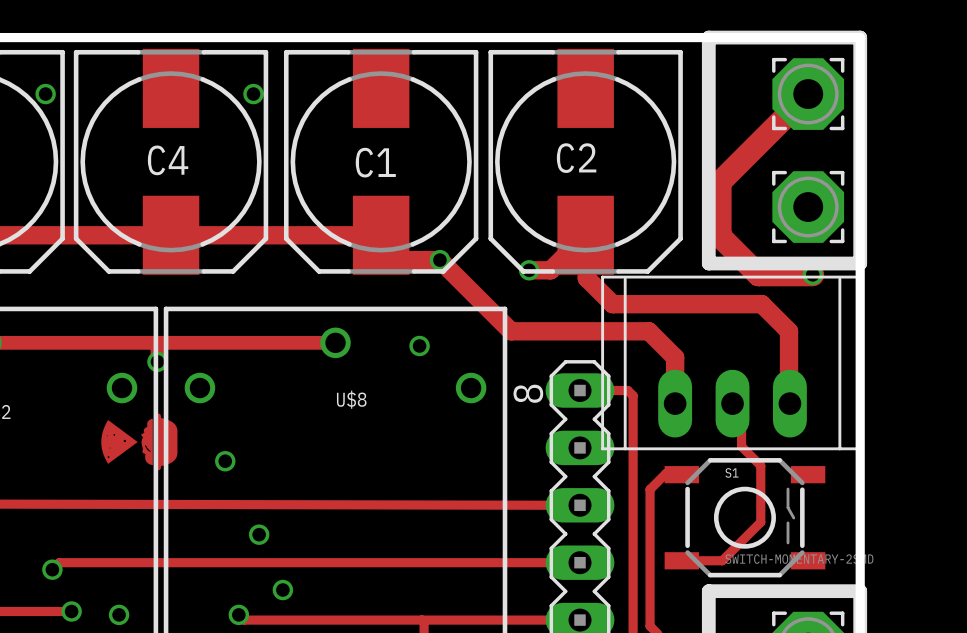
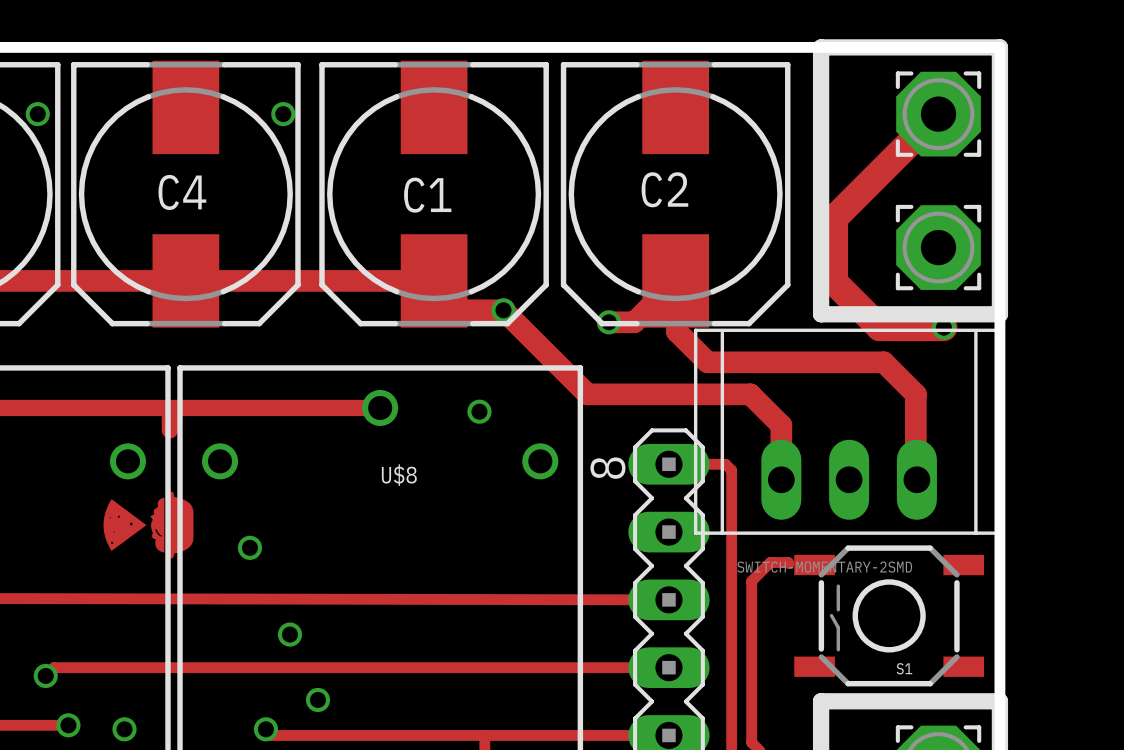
via: (157, 361) -> none
track: (732, 403) (741, 412) (741, 446) (760, 465) (760, 522) (722, 560) (681, 560) -> none
S1 rotation: 0° (744, 517) -> 180° (889, 615)

